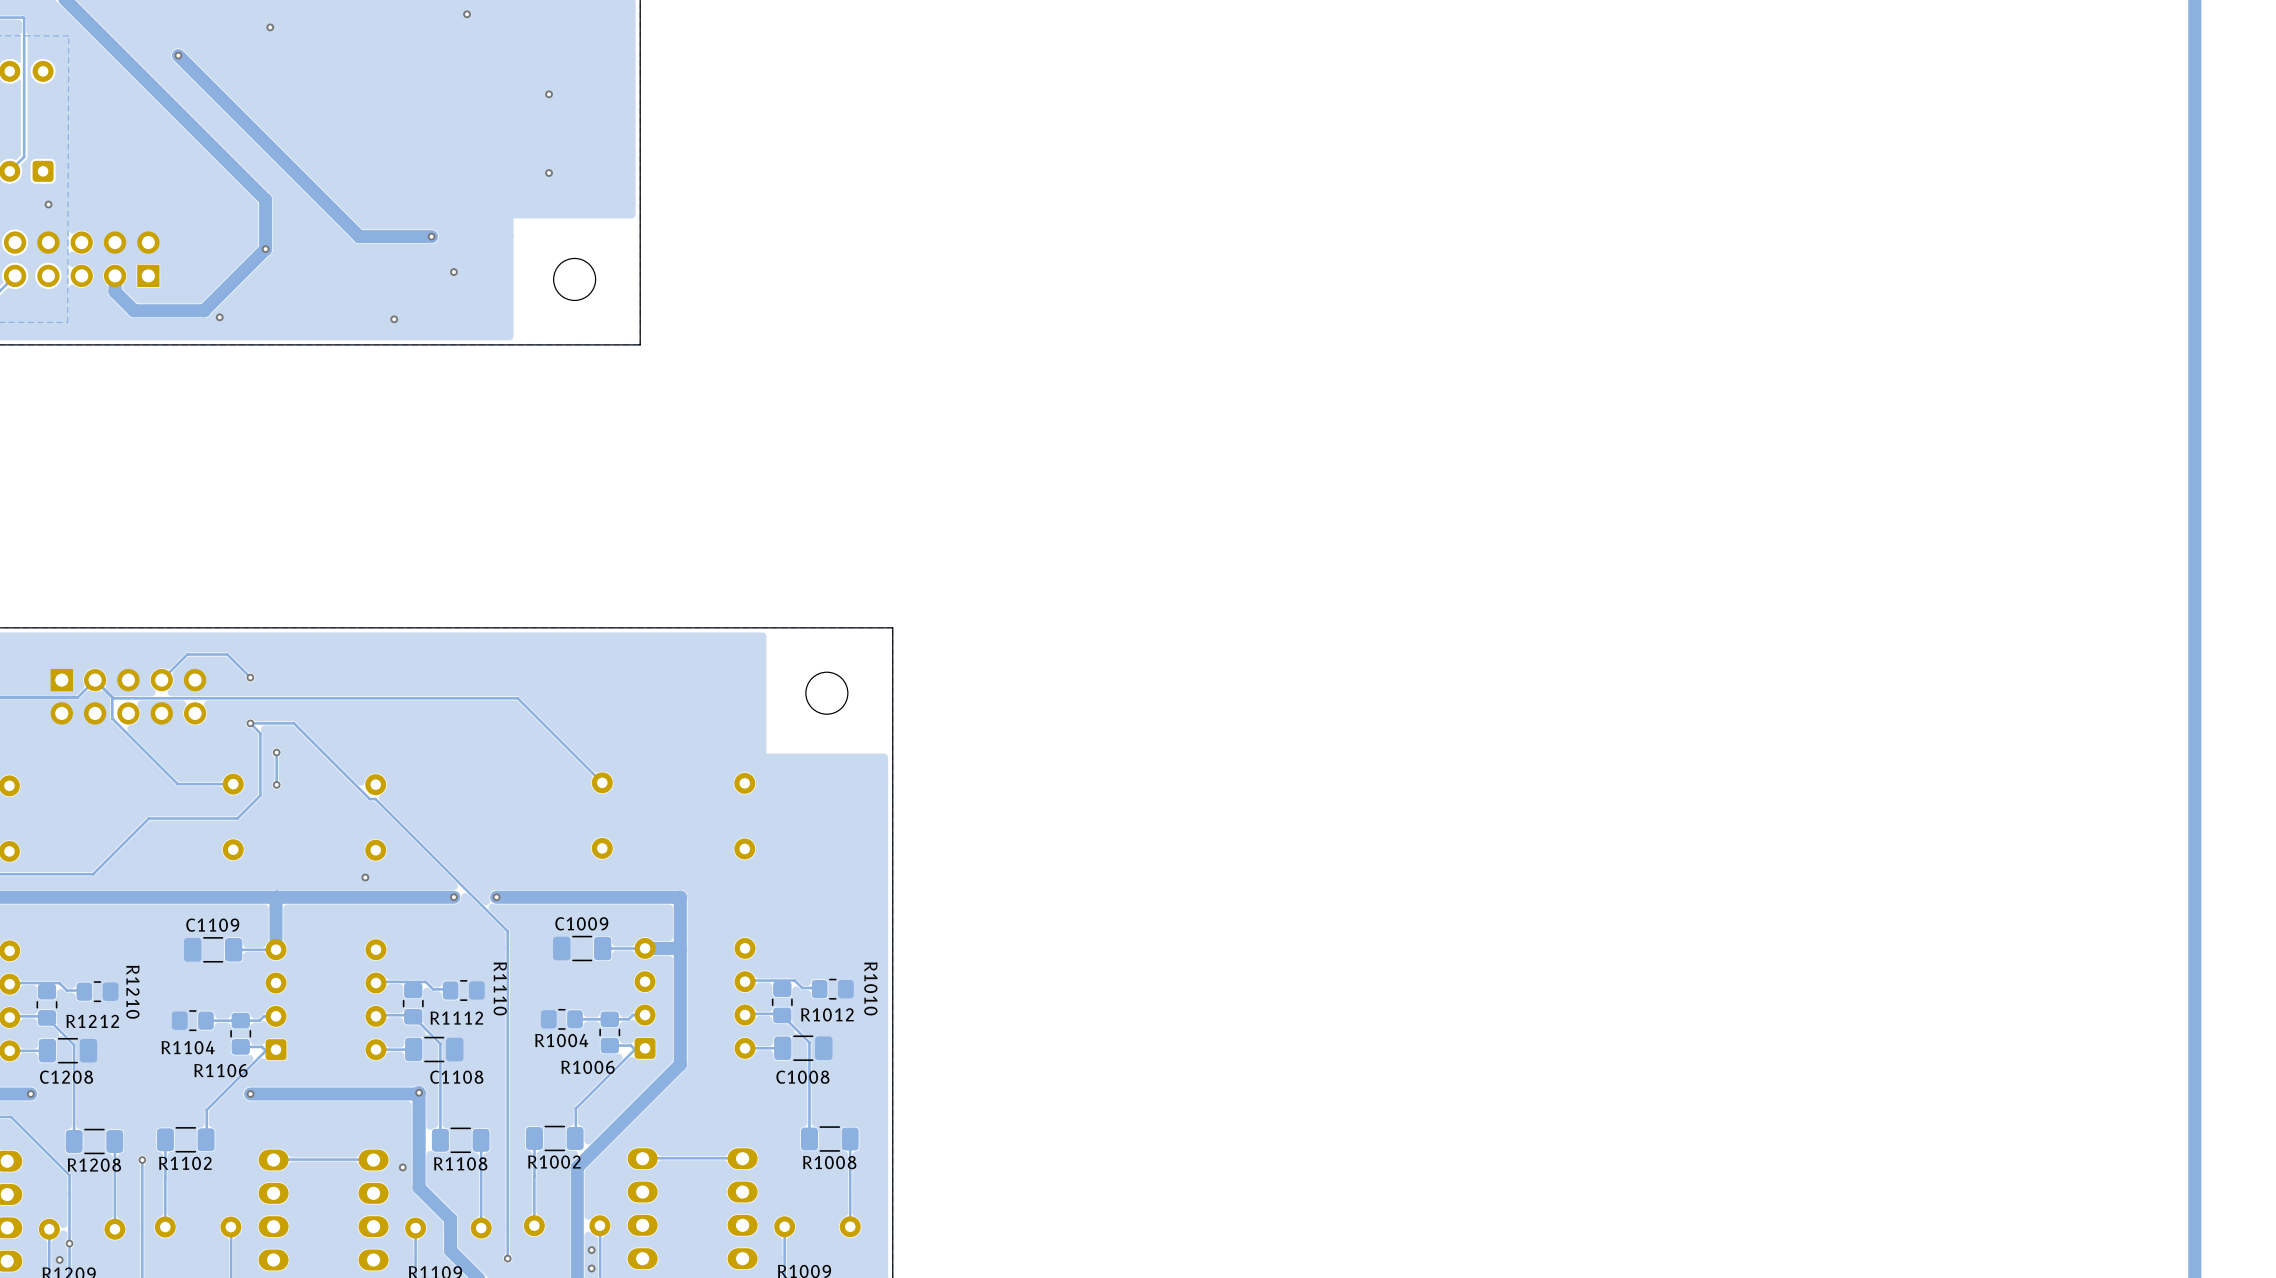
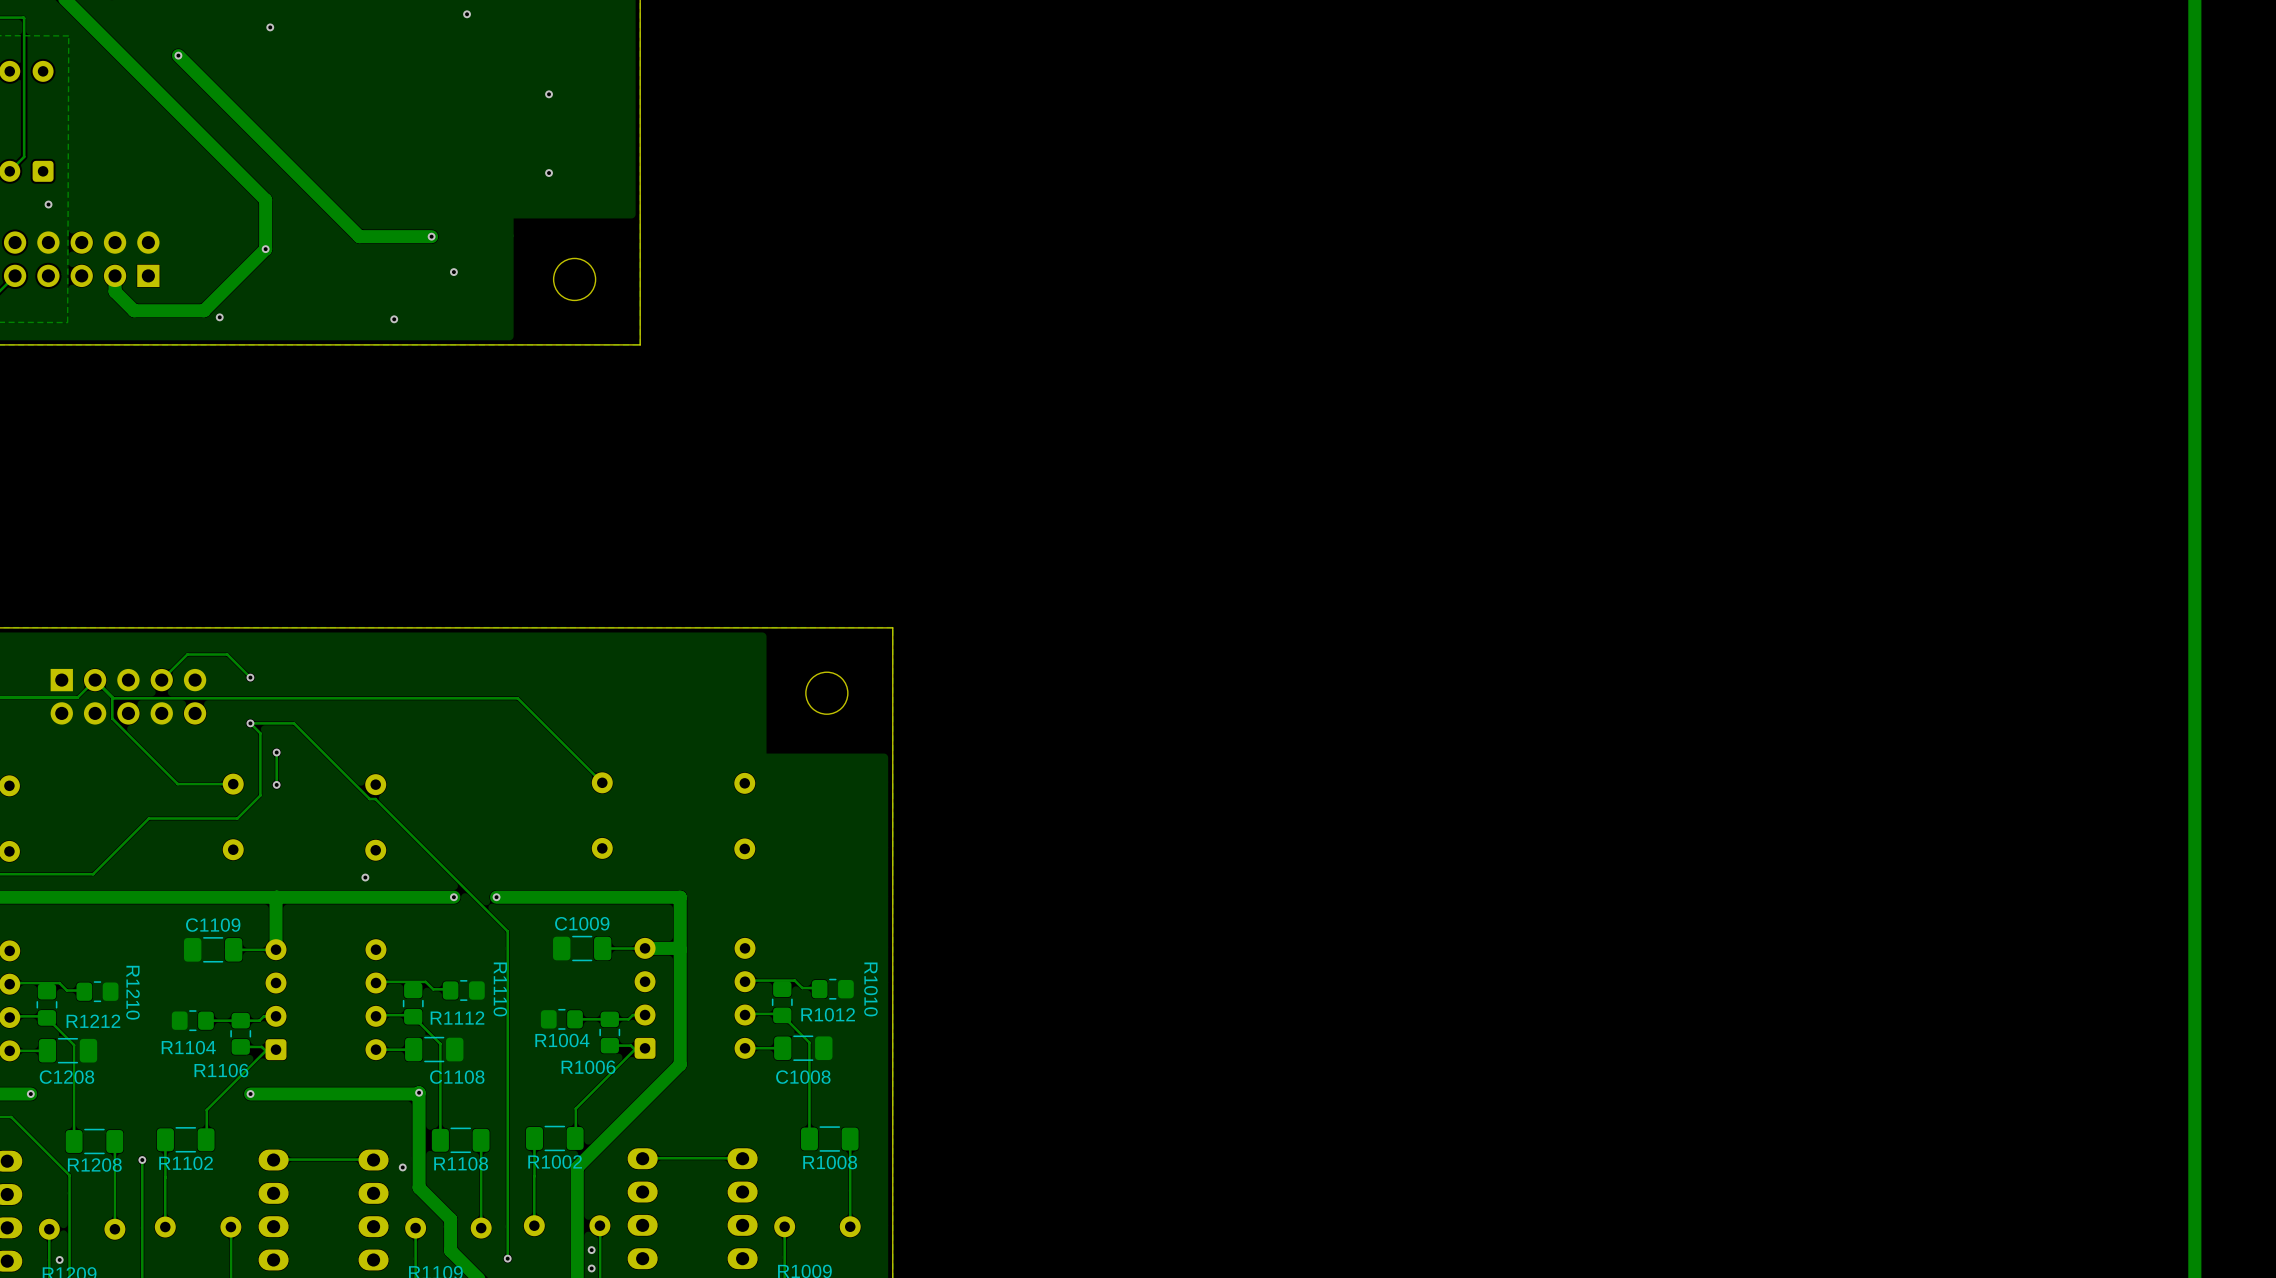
via: (69, 1243) -> none

